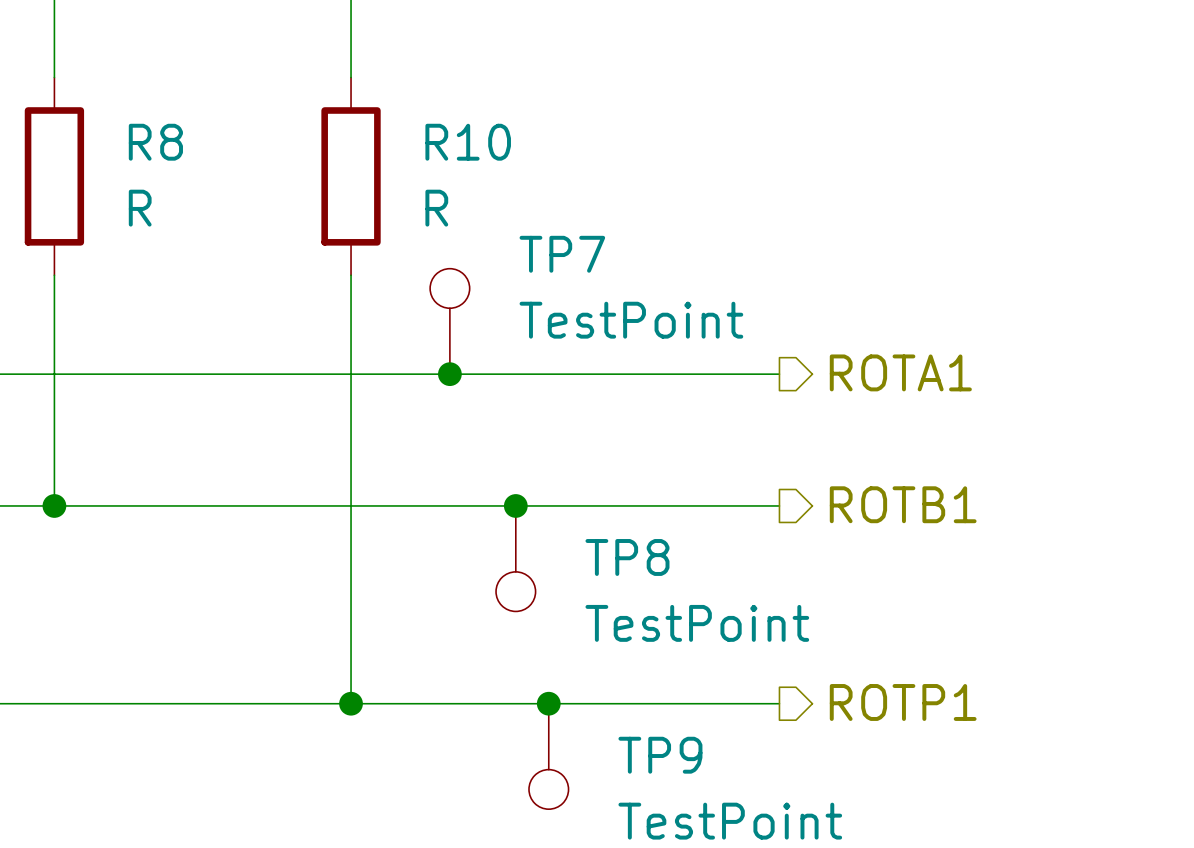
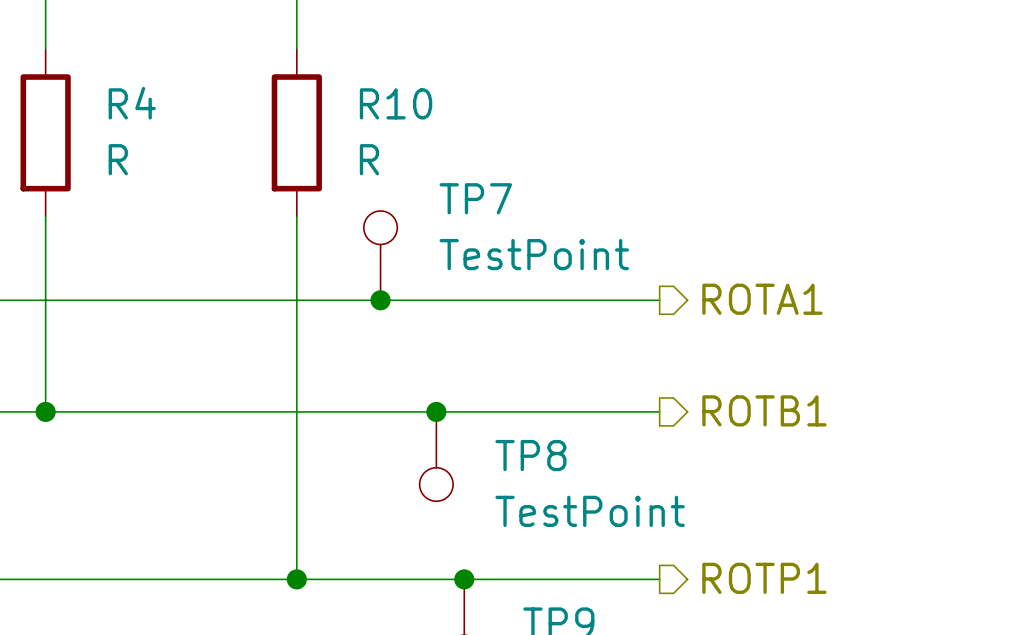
R8 name: R8 (155, 142) -> R4 (132, 103)

